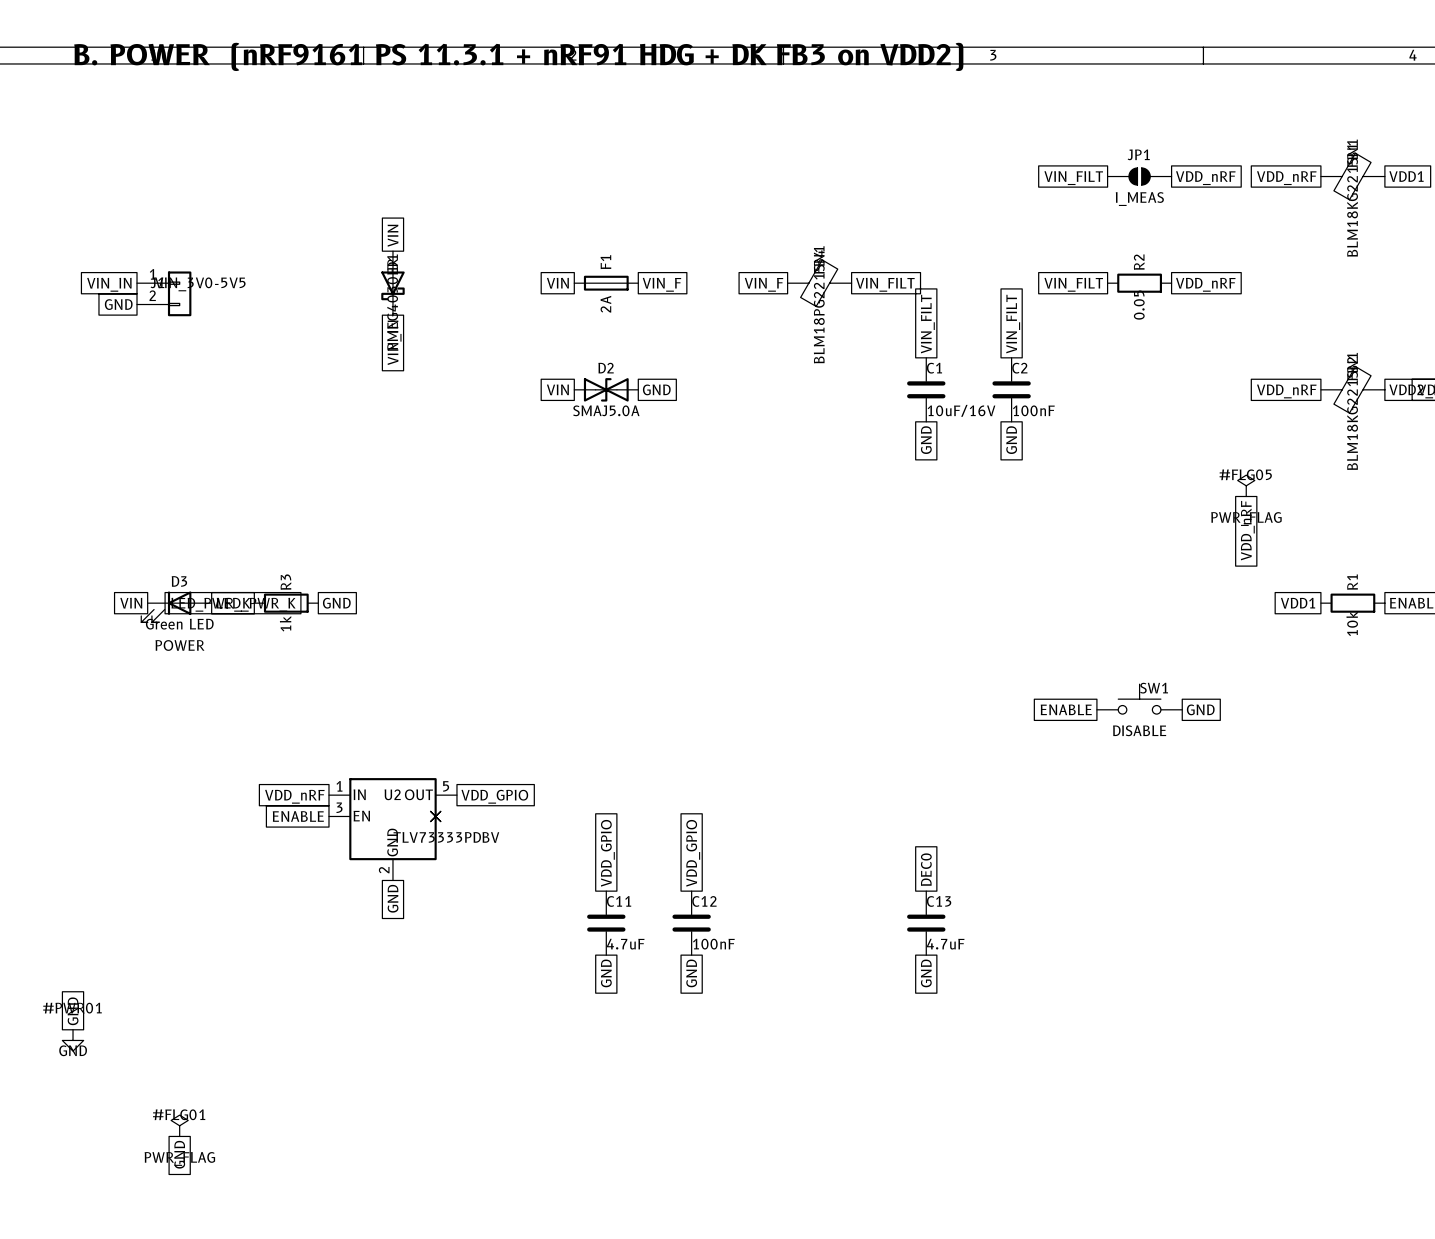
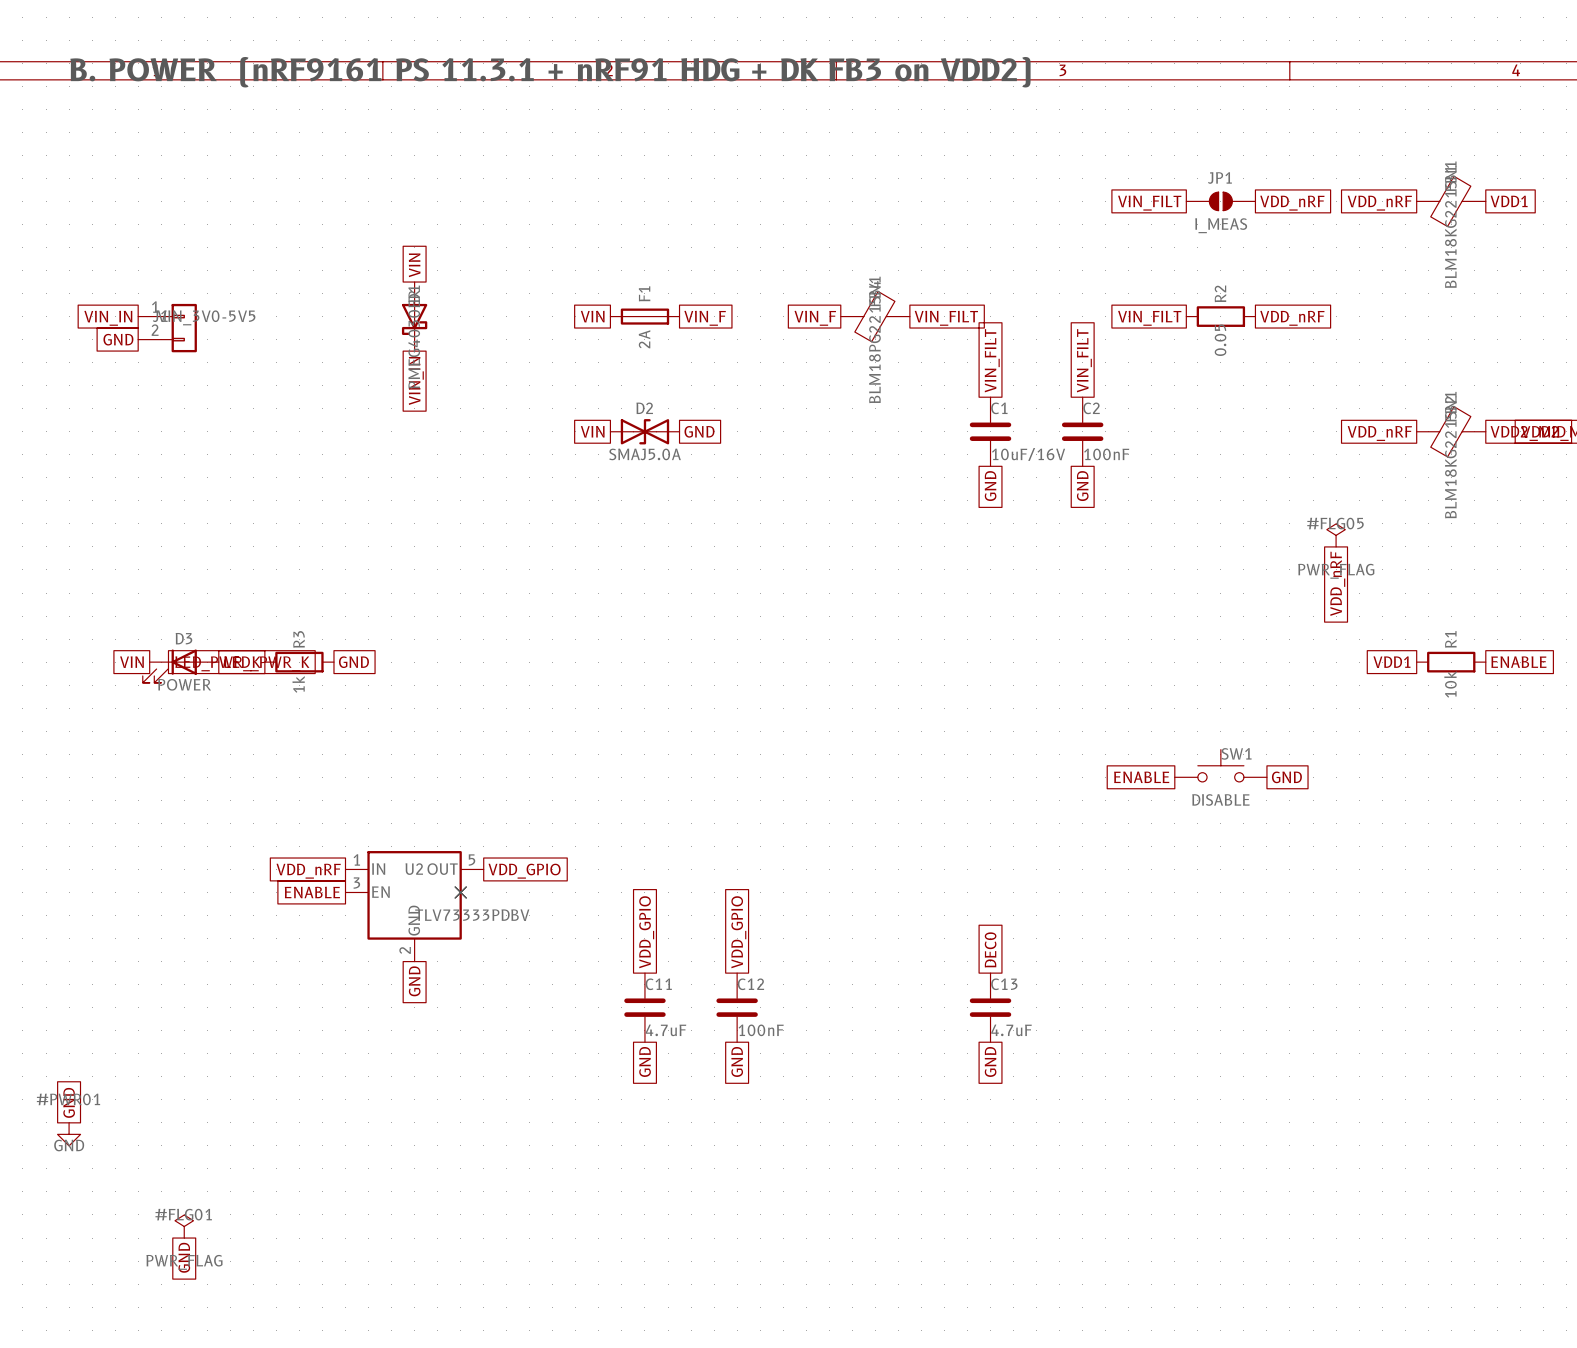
D3 value: Green LED (179, 624) -> POWER (184, 684)
D3 text: POWER (179, 645) -> none

